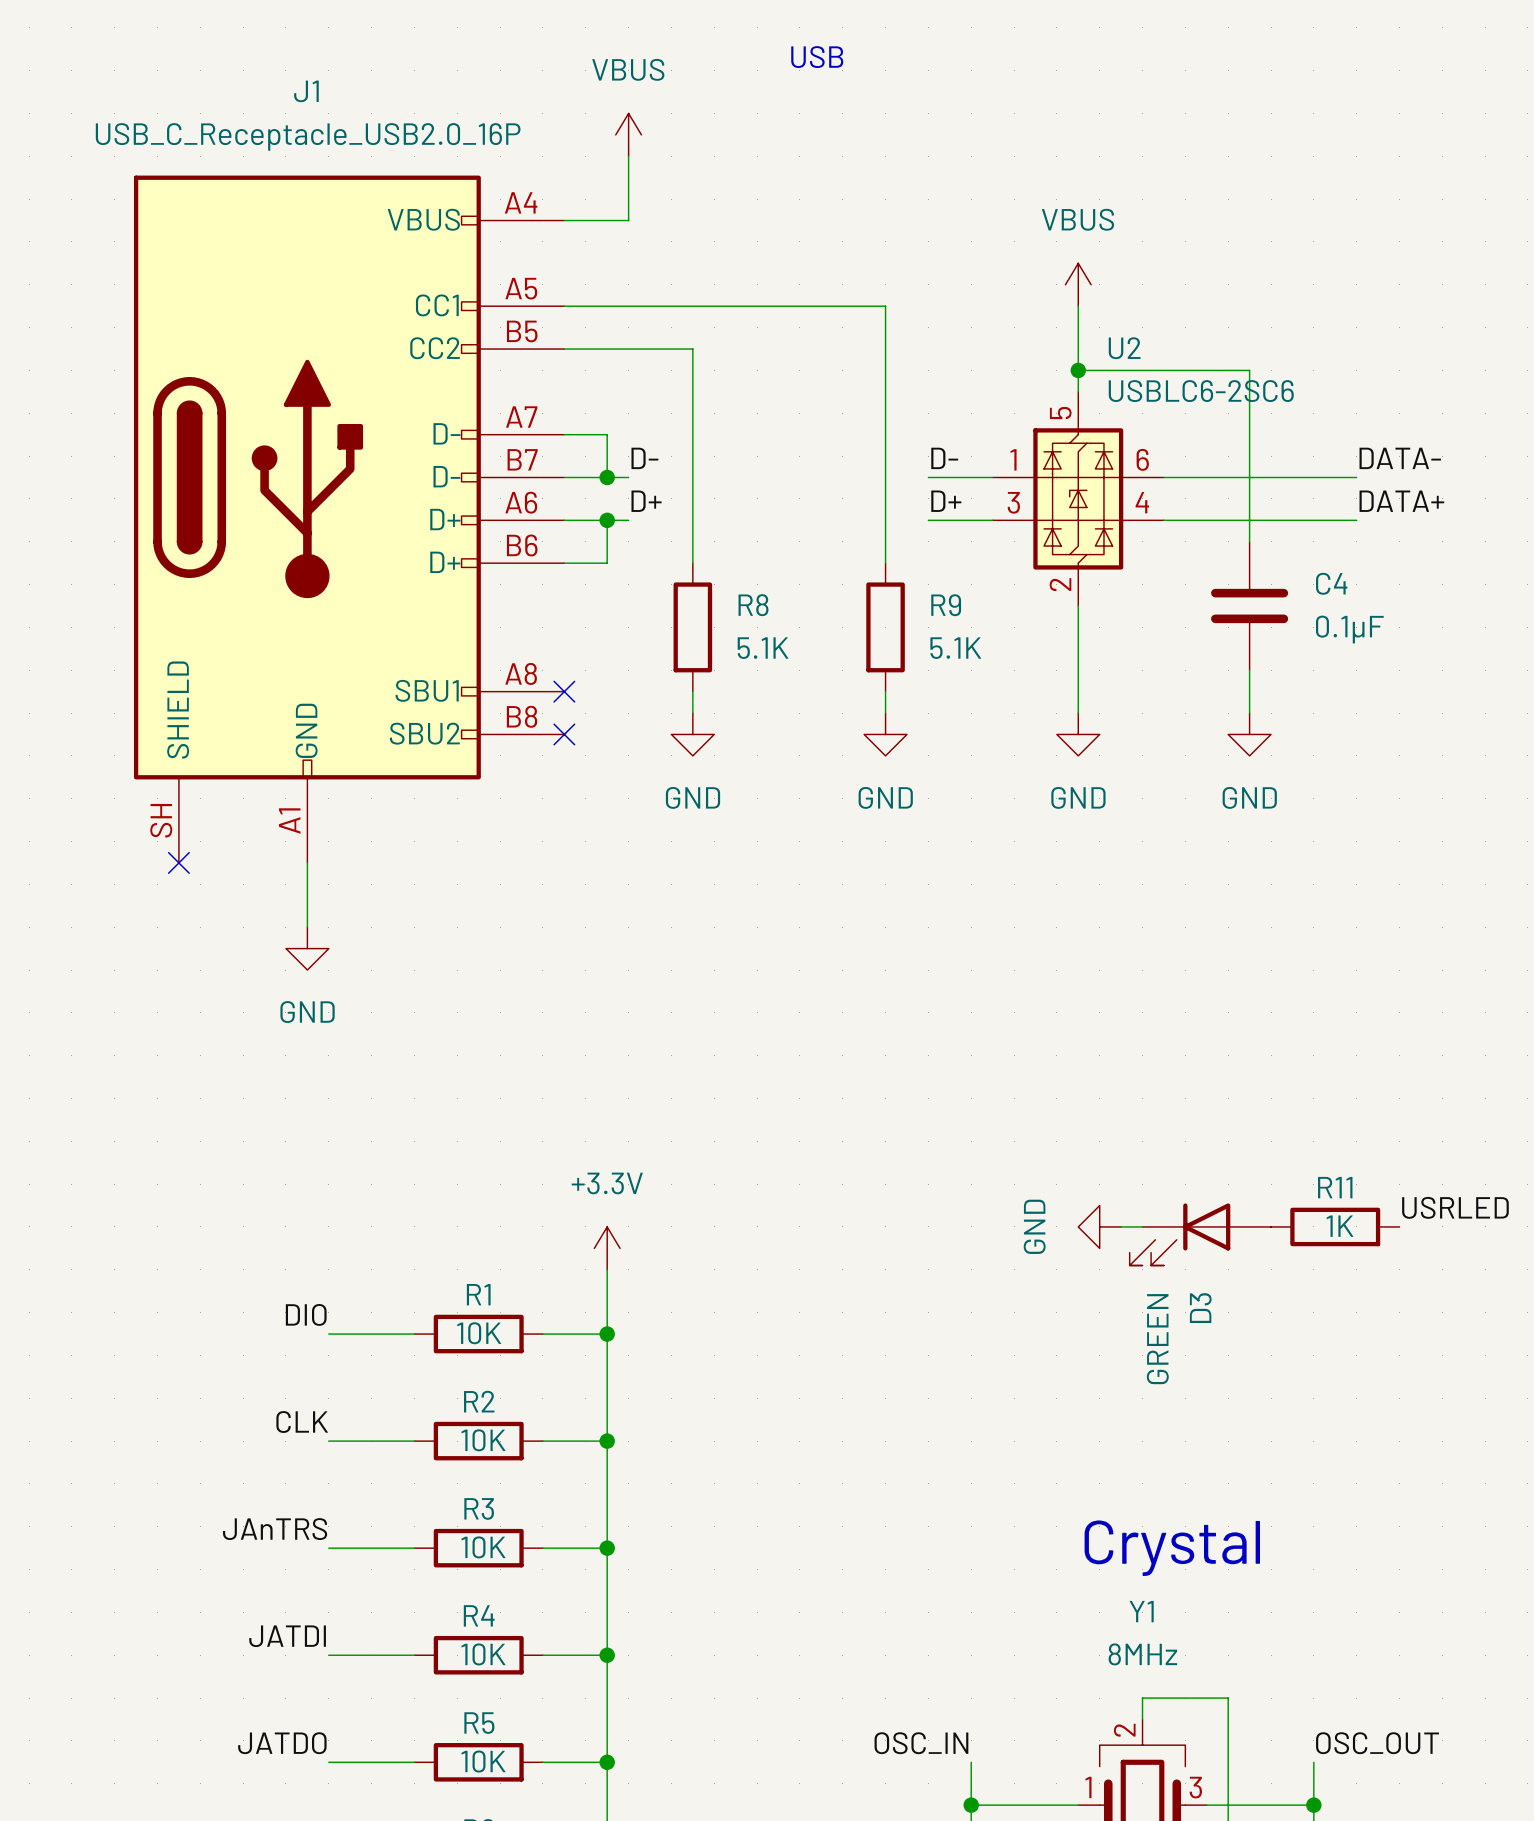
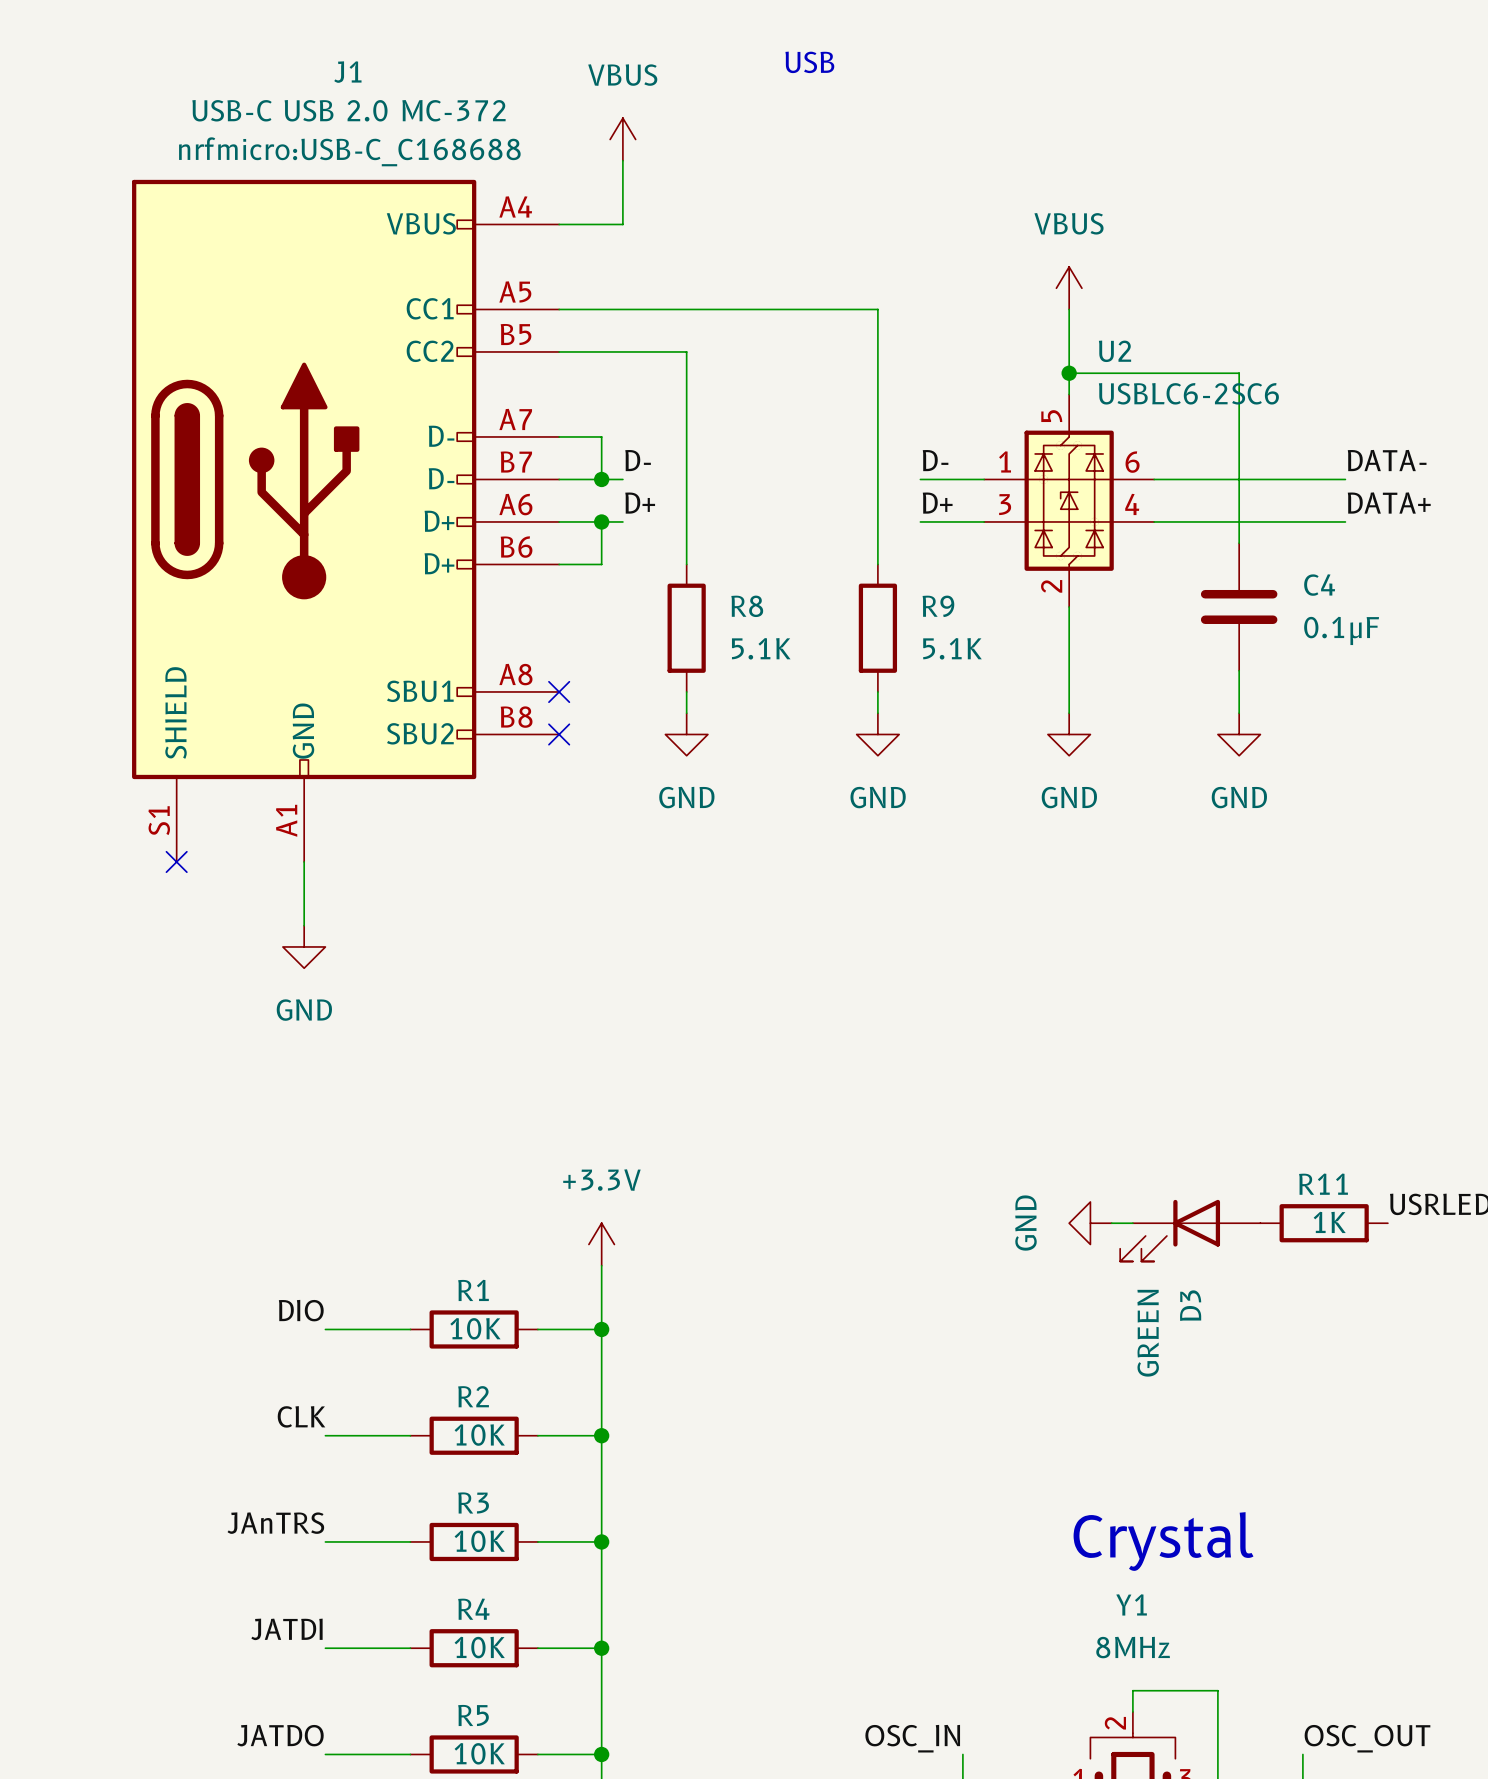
J1 name position: J1 (306, 91) -> J1 (347, 72)
J1 value: USB_C_Receptacle_USB2.0_16P (308, 136) -> USB-C USB 2.0 MC-372 (348, 110)
J1 text: none -> nrfmicro:USB-C_C168688 (349, 151)
J1 pin number: SH (161, 820) -> S1 (159, 820)

